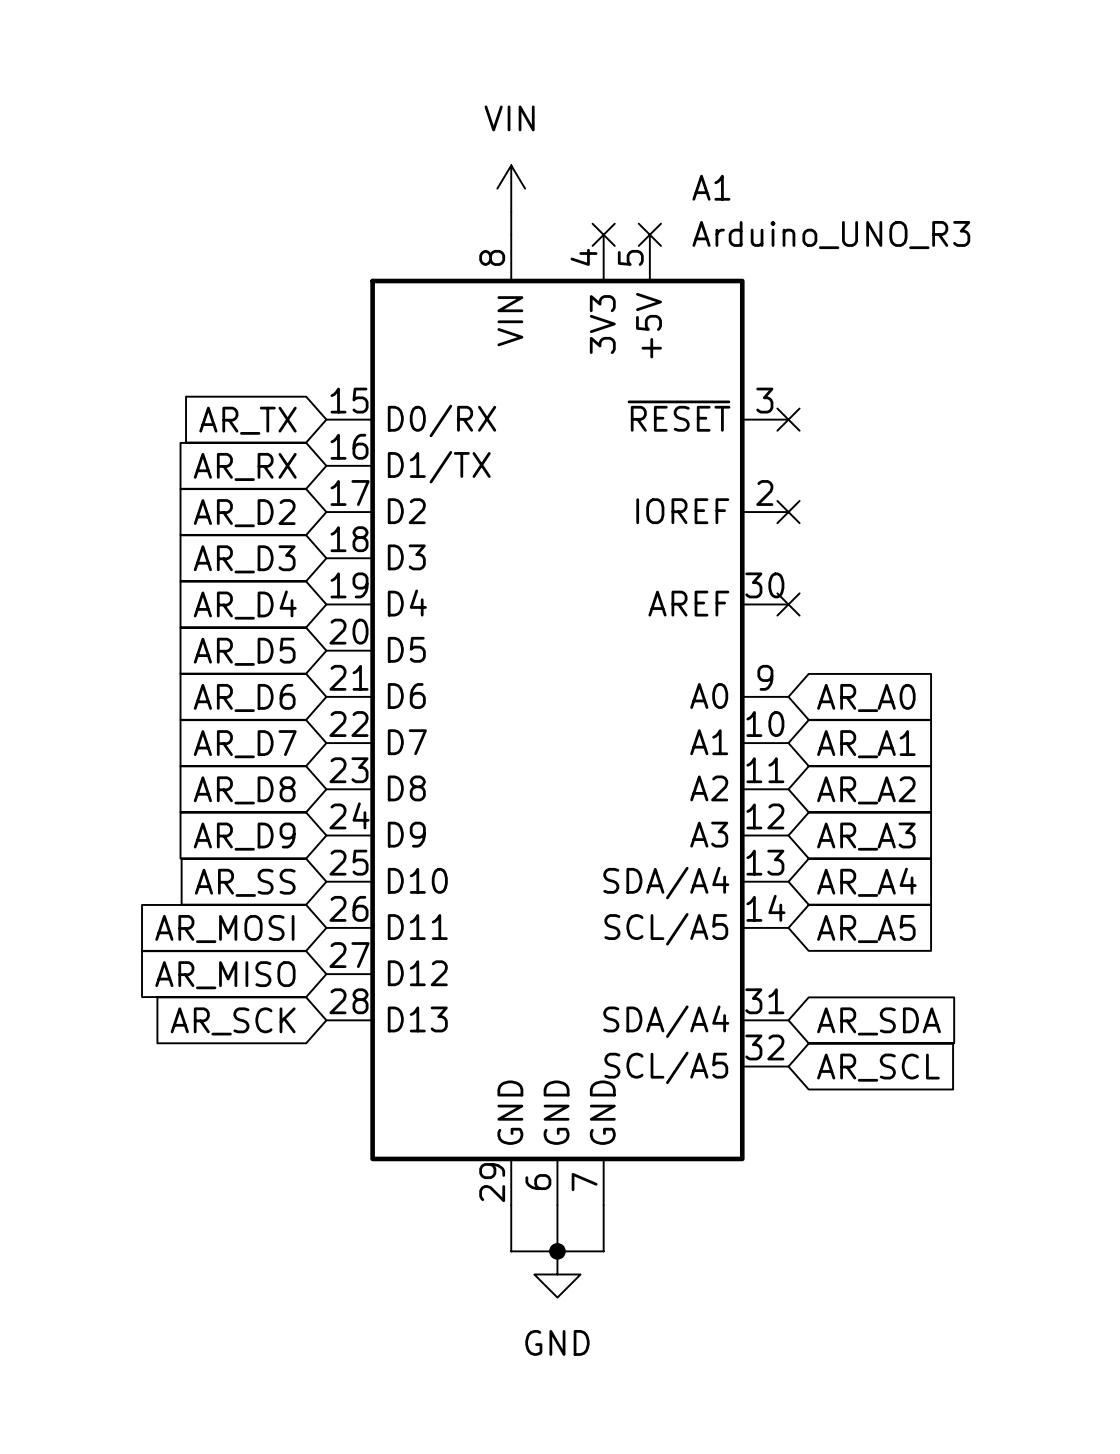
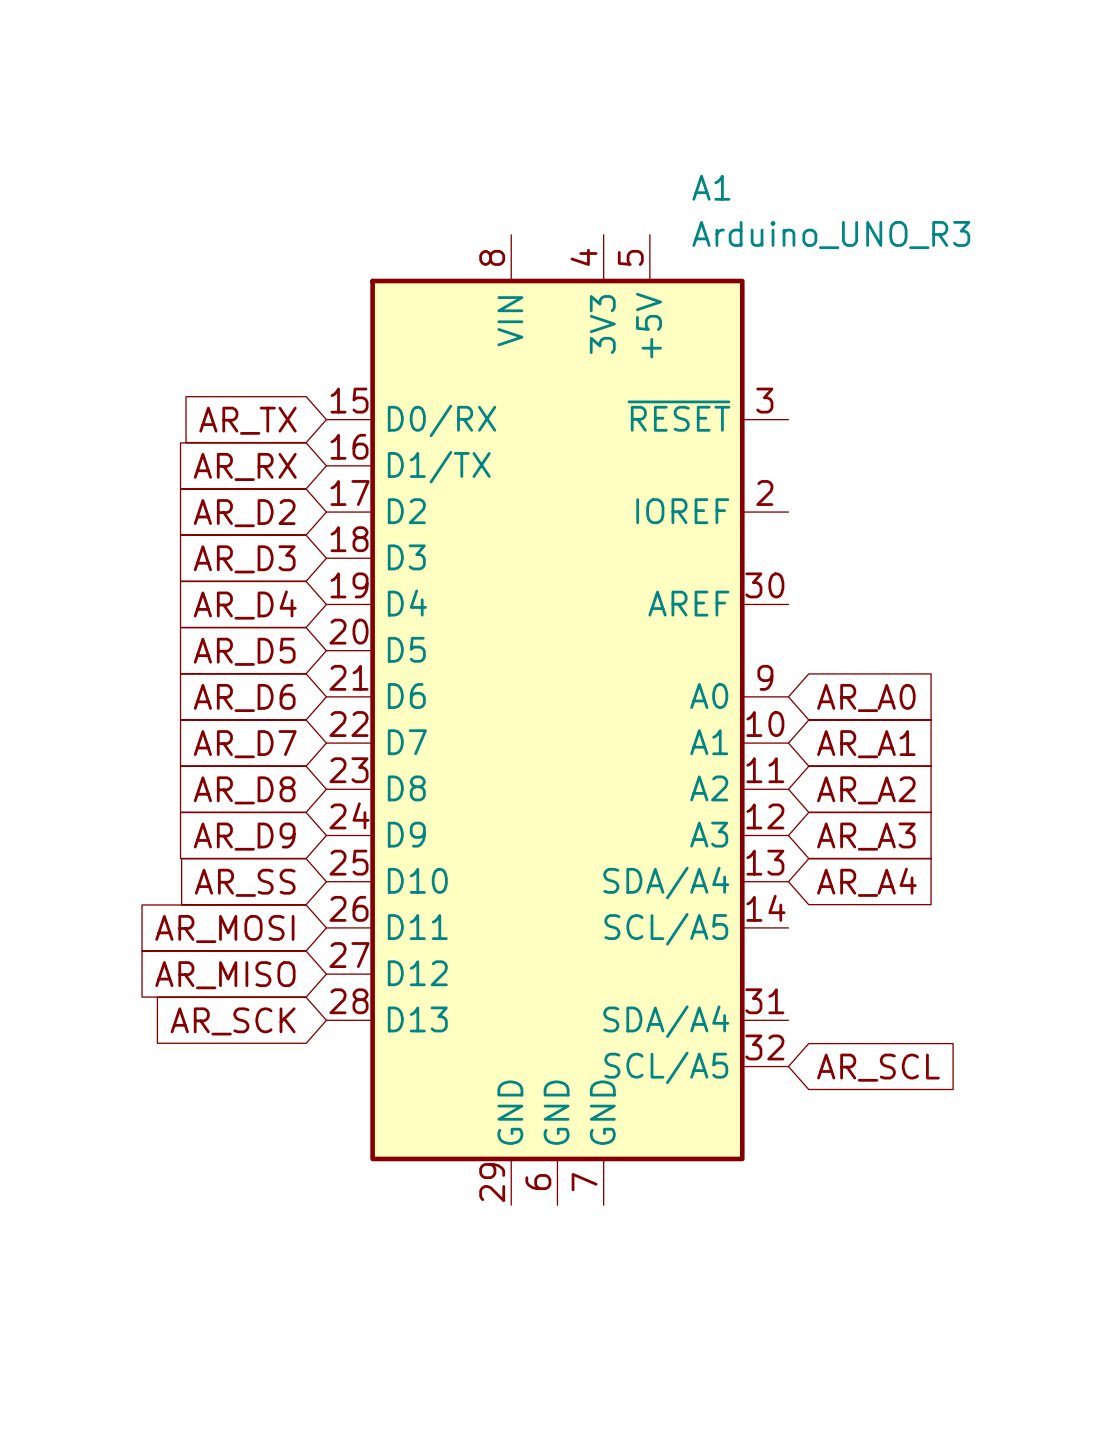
power symbol: VIN (511, 188) -> none
wire: (511, 211) (511, 234) -> none
no-connect mark: (603, 234) -> none
no-connect mark: (649, 234) -> none
no-connect mark: (788, 419) -> none
no-connect mark: (788, 512) -> none
no-connect mark: (788, 604) -> none
global label: AR_A5 (866, 929) -> none
global label: AR_SDA (879, 1021) -> none
wire: (511, 1205) (511, 1251) (603, 1251) (603, 1205) -> none
wire: (557, 1205) (557, 1251) -> none
junction: (557, 1251) -> none
power symbol: GND (557, 1274) -> none

